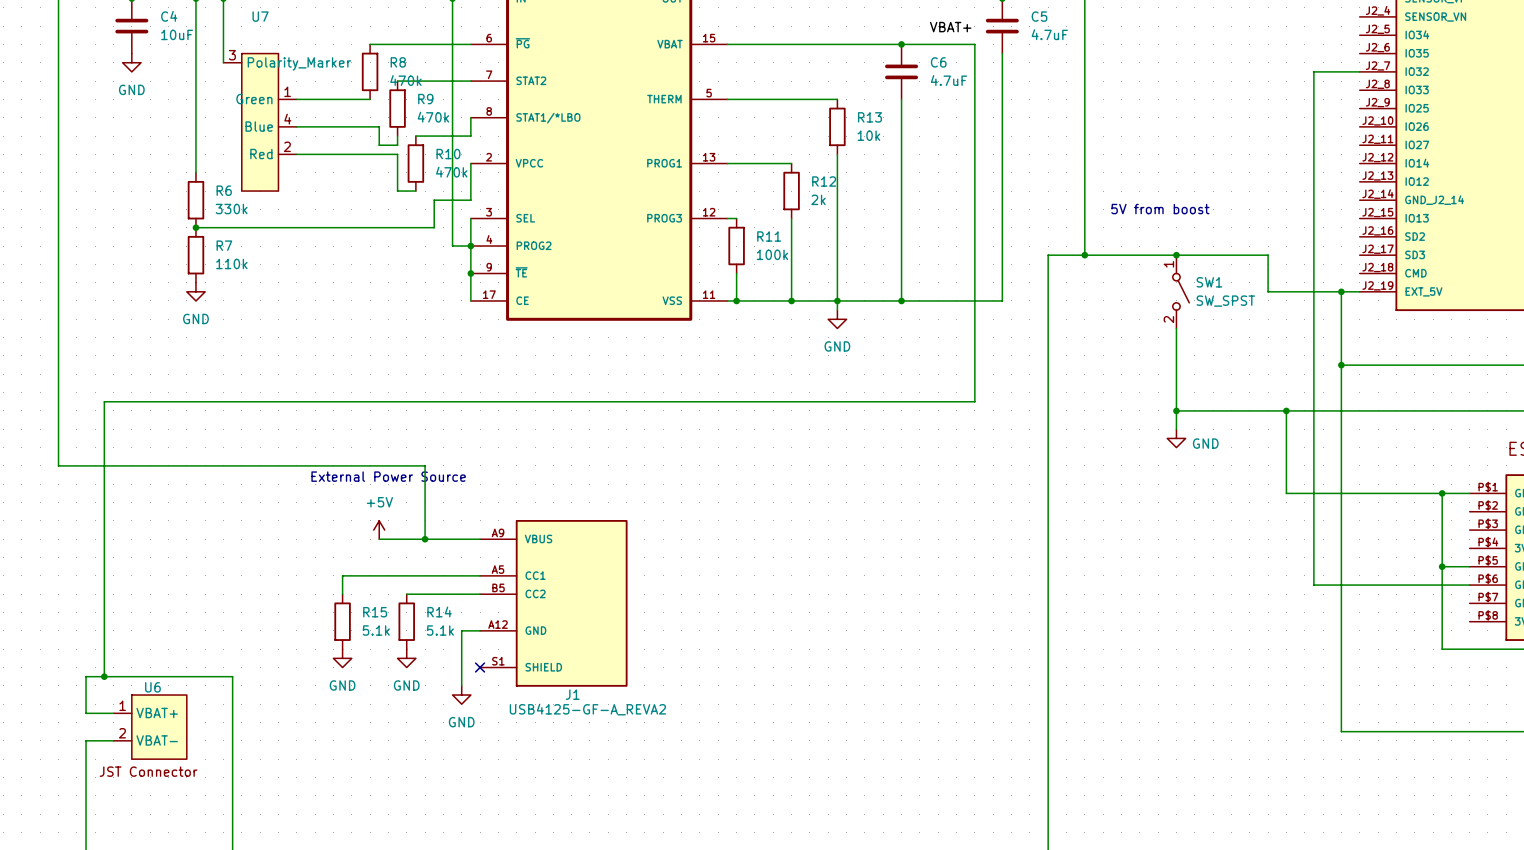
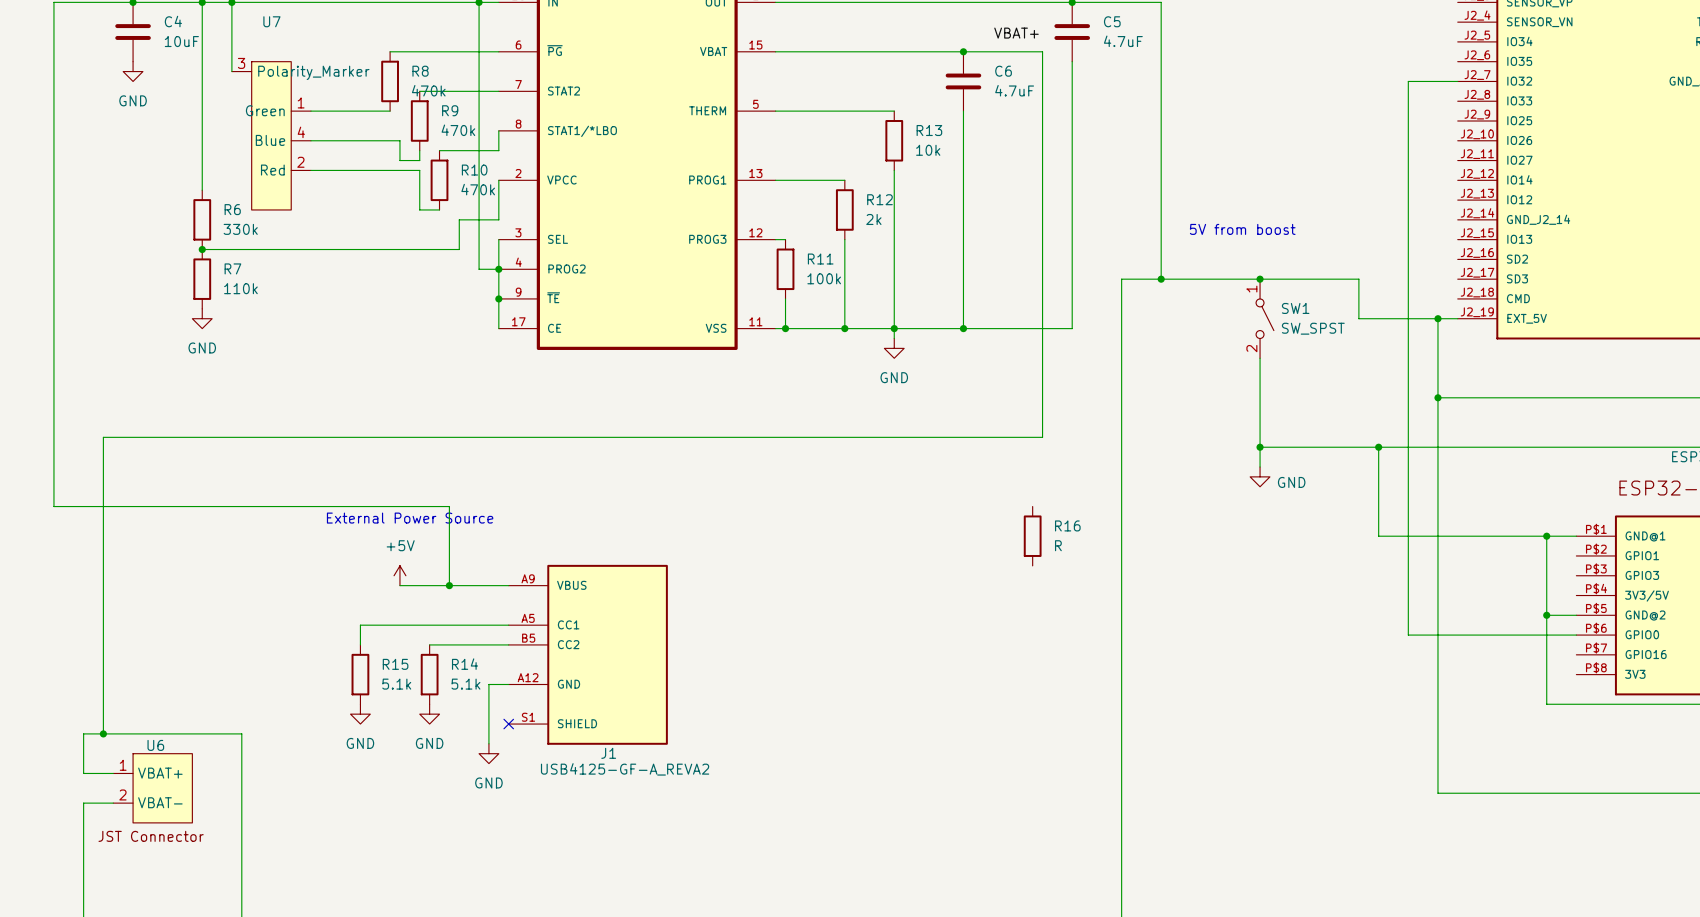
R16: none -> R (1032, 536)

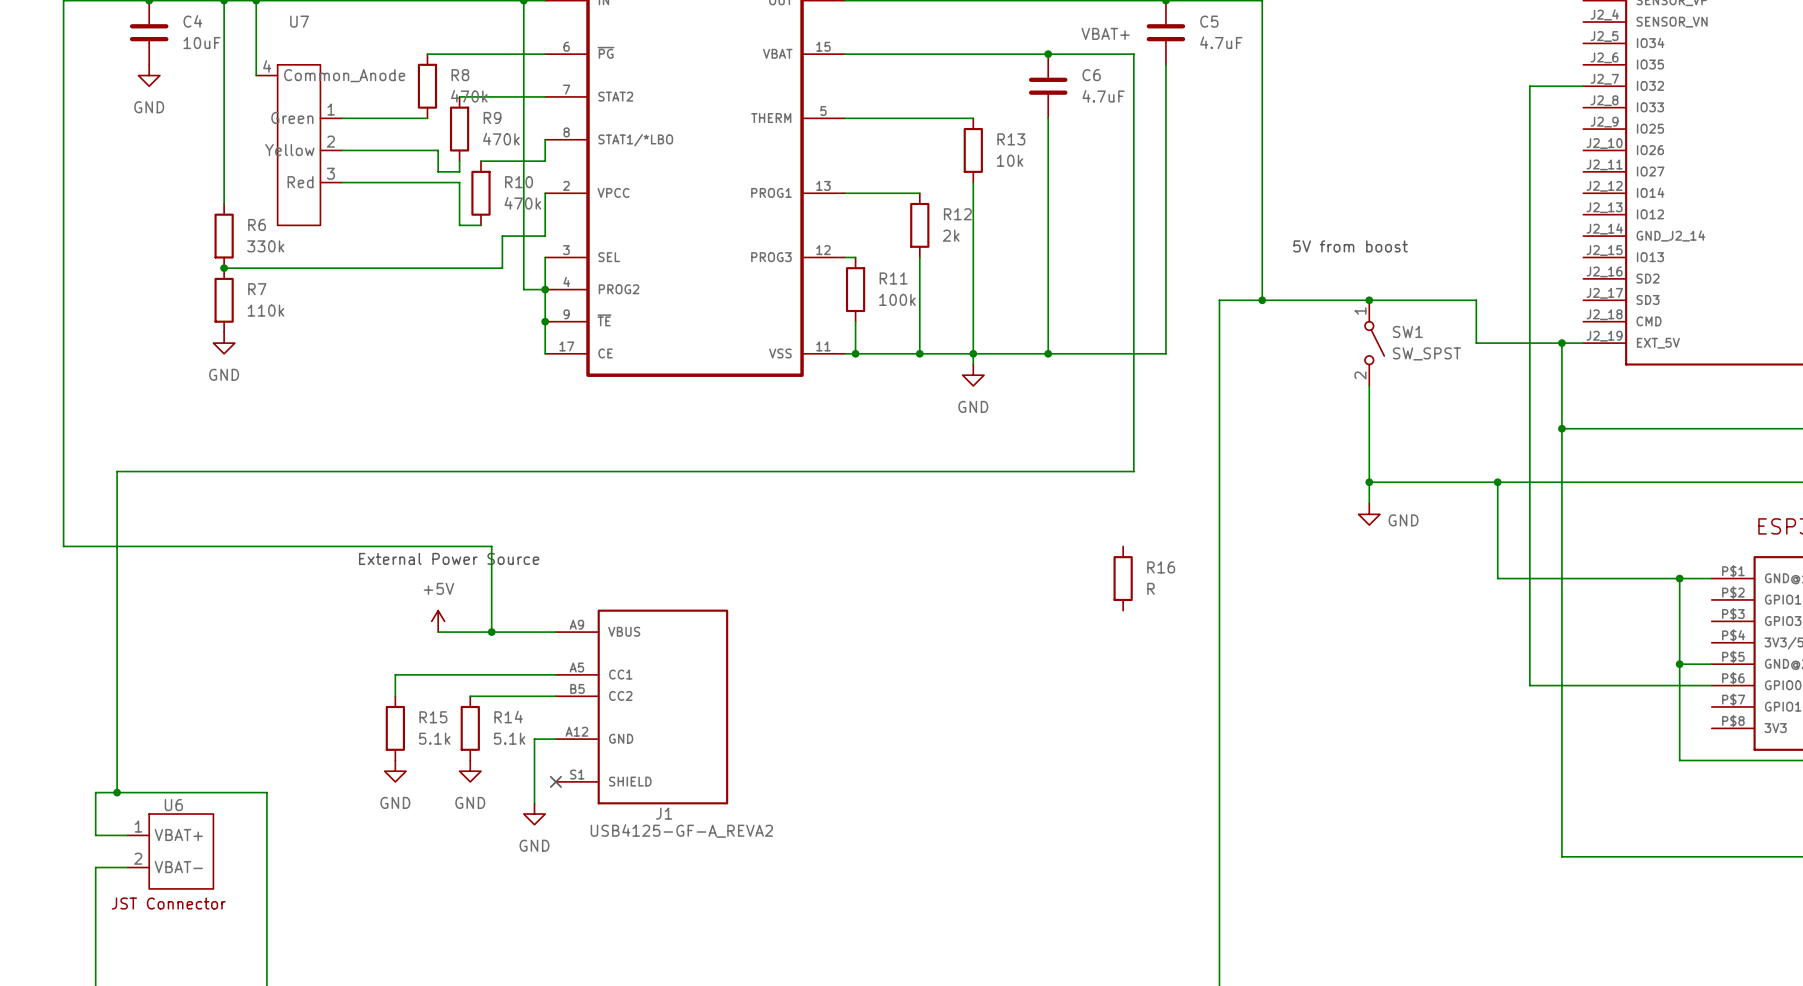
U7 pin number: 3 (241, 63) -> 4 (267, 66)
U7 pin name: Polarity_Marker (313, 72) -> Common_Anode (344, 75)
U7 pin number: 4 (301, 132) -> 2 (330, 141)
U7 pin name: Blue (270, 140) -> Yellow (289, 150)
U7 pin number: 2 (300, 162) -> 3 (330, 173)

